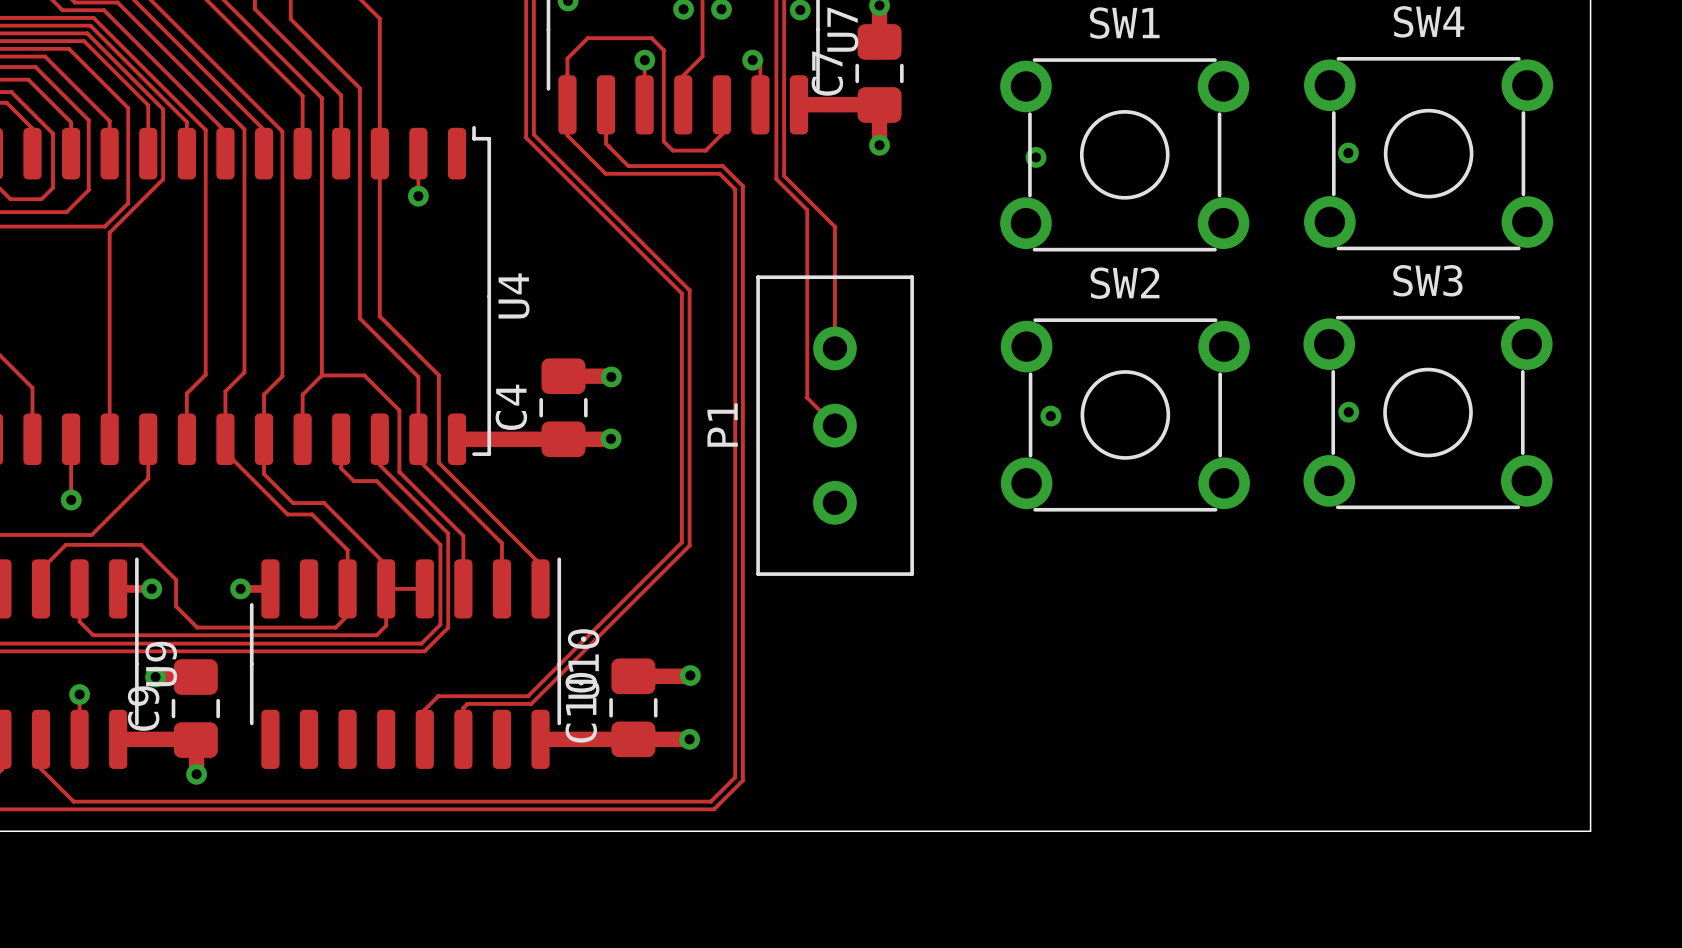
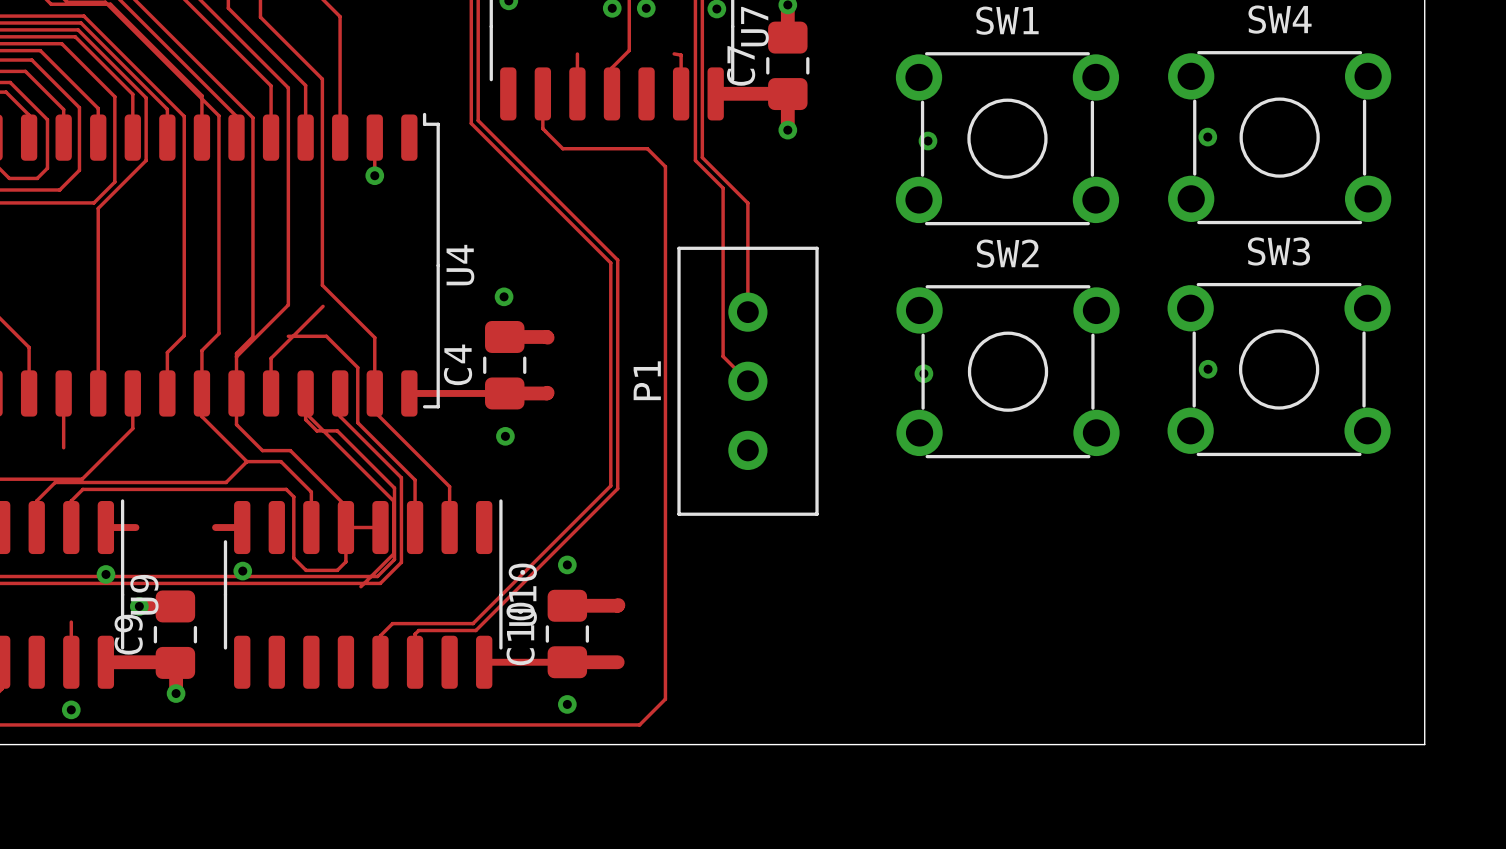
track: (57, 4) (62, 10) (104, 10) (225, 131) -> (51, 4) (110, 4) (201, 95) (201, 117)
track: (379, 18) (379, 316) (438, 375) (438, 462) (540, 564) (540, 588) -> (340, 16) (340, 137)
via: (644, 60) -> none
via: (752, 60) -> none
track: (721, 104) (721, 134) (705, 150) (672, 150) (663, 141) (663, 50) (651, 38) (587, 38) (567, 58) (567, 135) (605, 173) (719, 173) (735, 189) (735, 777) (710, 801) (73, 801) (41, 768) (41, 739) -> none
via: none -> (504, 296)
track: (321, 340) (321, 375) (302, 394) (302, 400) -> (288, 305) (236, 356)
track: none -> (323, 306) (271, 358)
via: (611, 376) -> none
via position: (1050, 416) -> (923, 373)
via: (610, 438) -> none
track width: thick (457, 439) (563, 439) -> thin (409, 393) (504, 393)
track: (225, 452) (287, 514) (312, 514) (347, 550) -> (201, 405) (201, 416) (246, 461)
track: none -> (305, 414) (393, 501) (393, 553) (360, 586)
via: none -> (505, 436)
via: (71, 500) -> none
track: none -> (246, 461) (280, 461) (311, 492)
track: (41, 569) (65, 544) (141, 544) (176, 579) (176, 606) (197, 627) (335, 627) (347, 615) (347, 588) -> (36, 510) (36, 500) (55, 482) (226, 482) (246, 461)
track: (79, 588) (79, 621) (93, 635) (376, 635) (386, 625) -> (71, 527) (71, 500) (82, 489) (286, 489) (293, 496) (293, 558) (306, 570) (337, 570) (345, 560)
via: (151, 588) -> none
via position: (240, 588) -> (242, 571)
via: none -> (567, 564)
via: none -> (105, 574)
via: (690, 675) -> none
via: (79, 694) -> none
track width: thick (540, 739) (633, 739) -> thin (484, 662) (567, 662)
via: (689, 739) -> none
via: none -> (567, 704)
via: none -> (71, 709)

